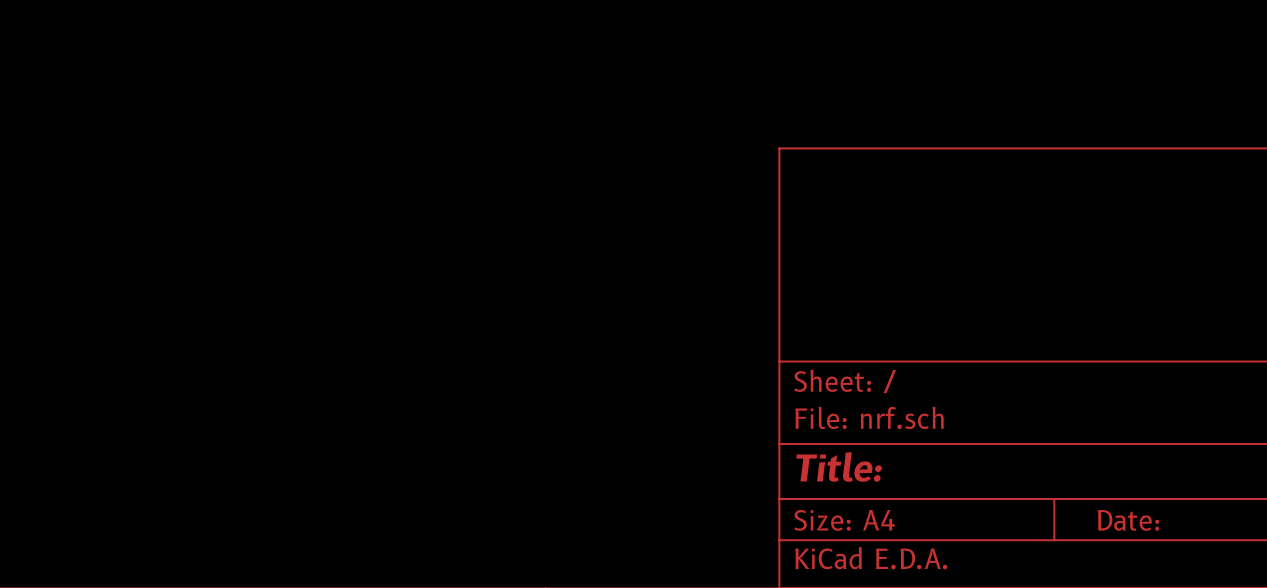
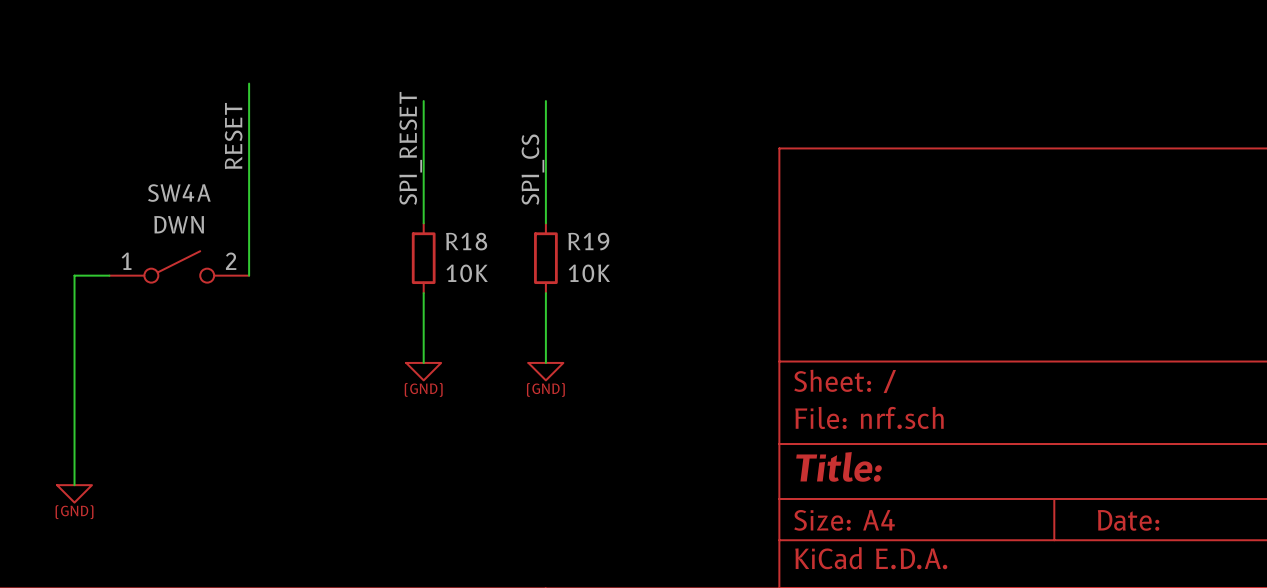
wire: none -> (249, 83) (249, 275)
wire: none -> (423, 101) (423, 223)
wire: none -> (545, 101) (545, 223)
label: none -> RESET (233, 136)
label: none -> SPI_RESET (410, 148)
label: none -> SPI_CS (532, 169)
R18: none -> 10K (423, 258)
R19: none -> 10K (545, 258)
SW4A: none -> DWN (179, 266)
wire: none -> (109, 275) (74, 275) (74, 485)
wire: none -> (423, 293) (423, 362)
wire: none -> (545, 293) (545, 362)
power symbol: none -> (423, 371)
power symbol: none -> (545, 371)
power symbol: none -> (74, 493)

